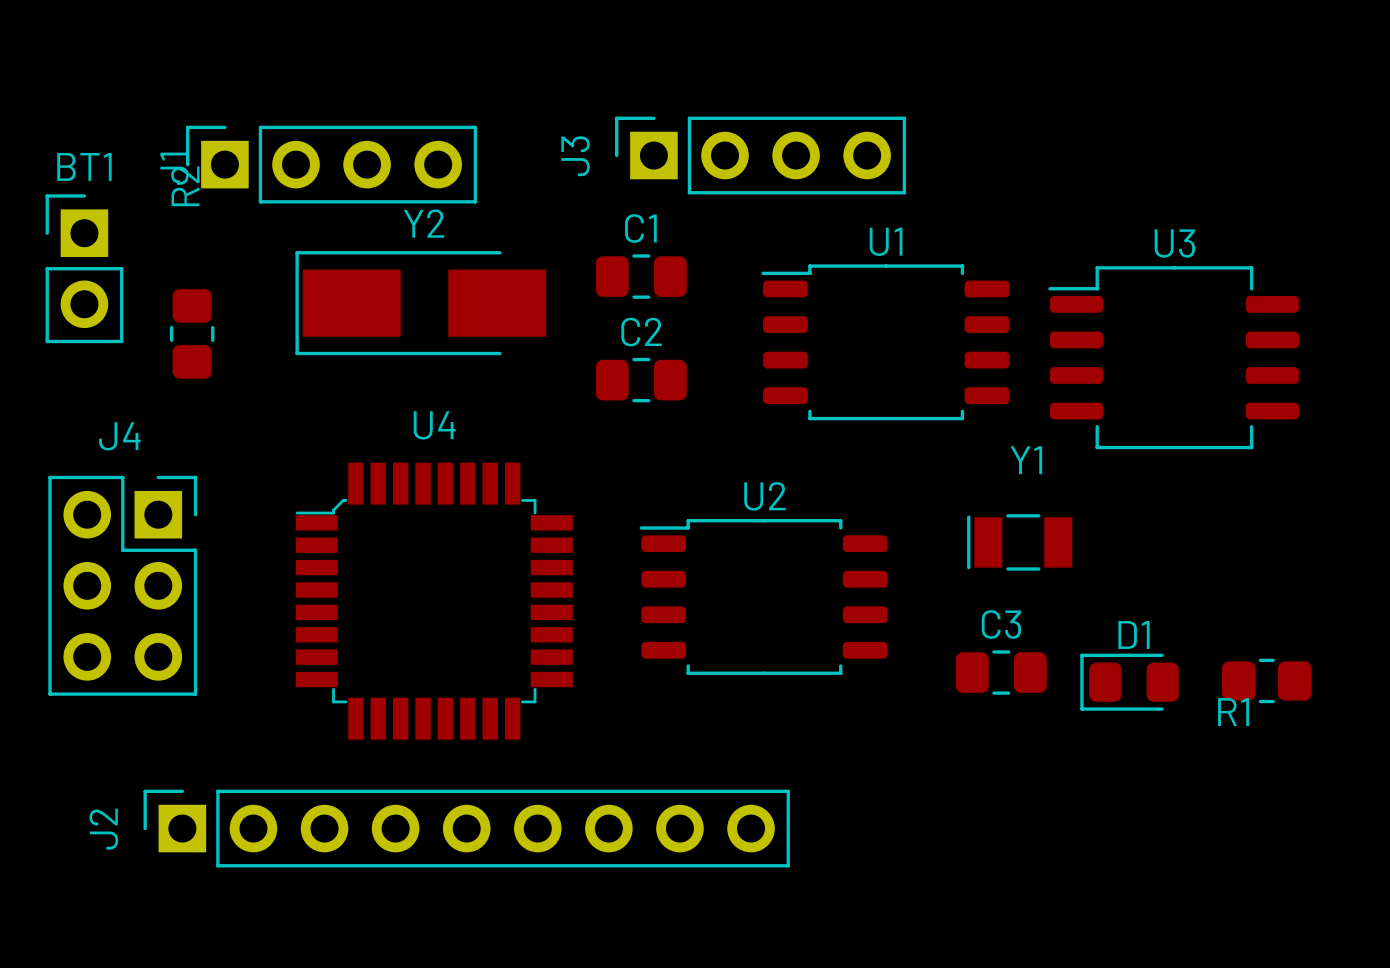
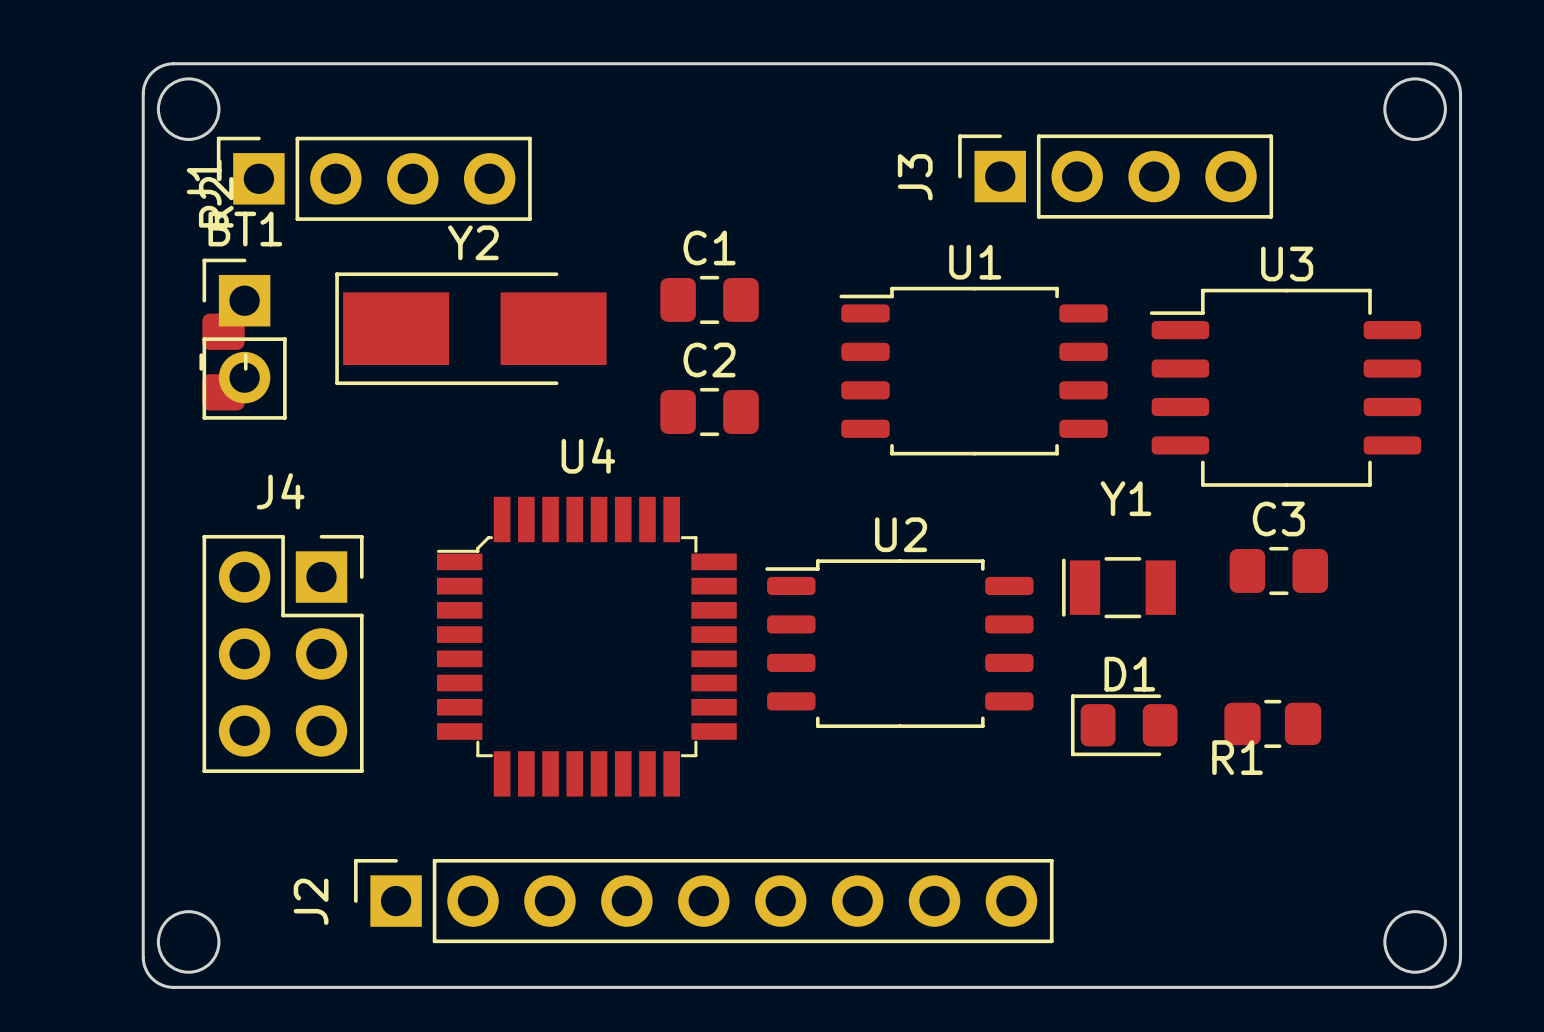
board edge: none -> (173, 63) (1430, 63) (1440, 65) (1449, 70) (1457, 80) (1460, 94) (1460, 957) (1458, 967) (1453, 975) (1443, 984) (1430, 987) (173, 987) (163, 985) (154, 980) (146, 970) (143, 957) (143, 94) (146, 80) (152, 72) (163, 65) (173, 63)
round board edge: none -> [156, 77, 221, 141]
round board edge: none -> [1383, 77, 1447, 141]
J3 position: (760, 155) -> (1115, 176)
BT1 position: (84, 268) -> (244, 339)
J4 position: (122, 585) -> (283, 653)
U2 position: (763, 596) -> (899, 643)
U4 position: (434, 601) -> (586, 646)
C3 position: (1001, 672) -> (1278, 570)
R1 position: (1266, 680) -> (1272, 723)
D1 position: (1129, 682) -> (1124, 725)
J2 position: (466, 828) -> (703, 901)
round board edge: none -> [156, 910, 221, 974]
round board edge: none -> [1383, 910, 1447, 974]

